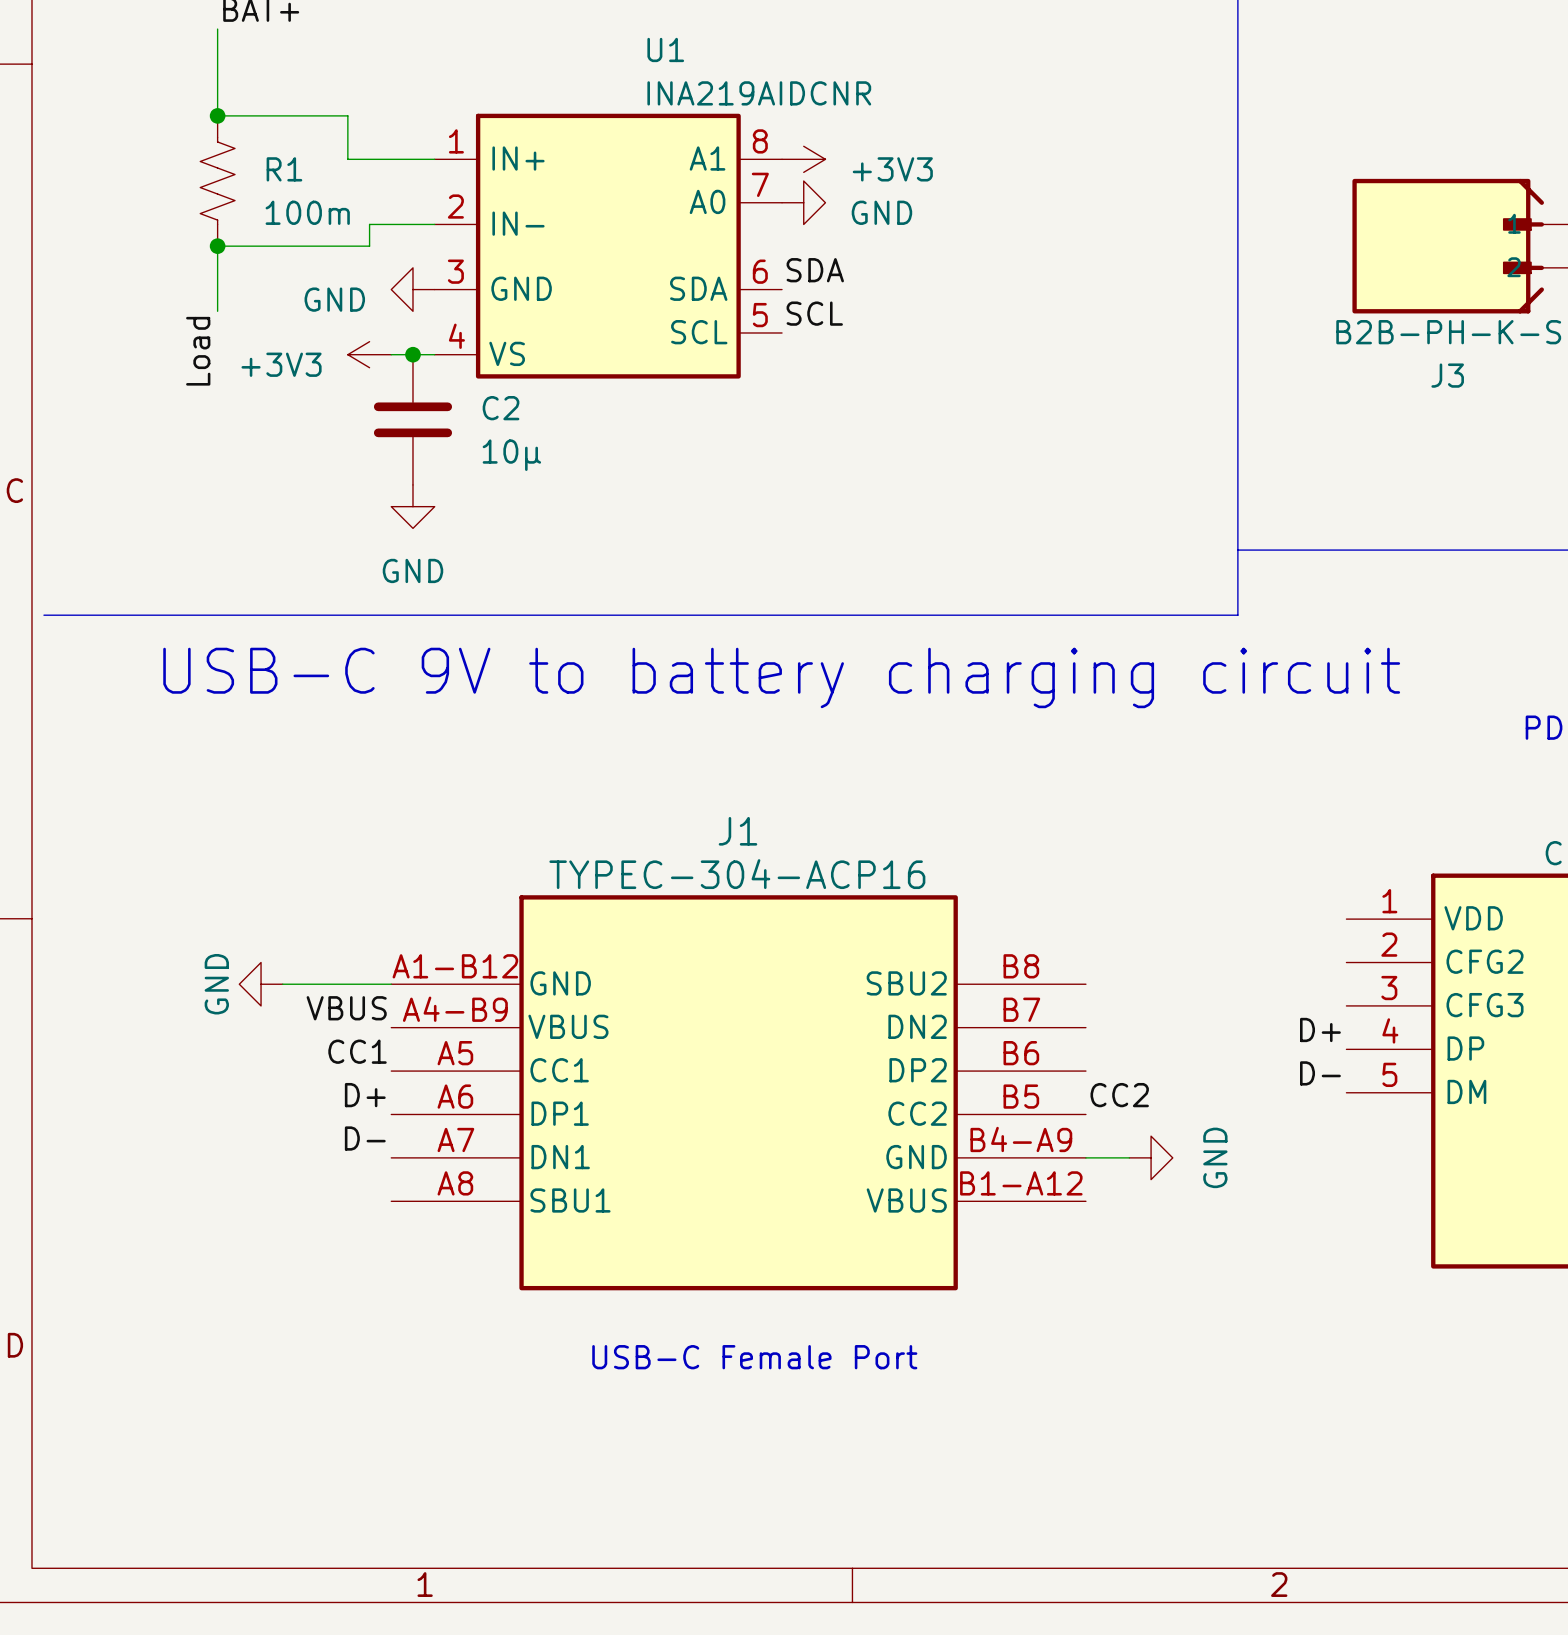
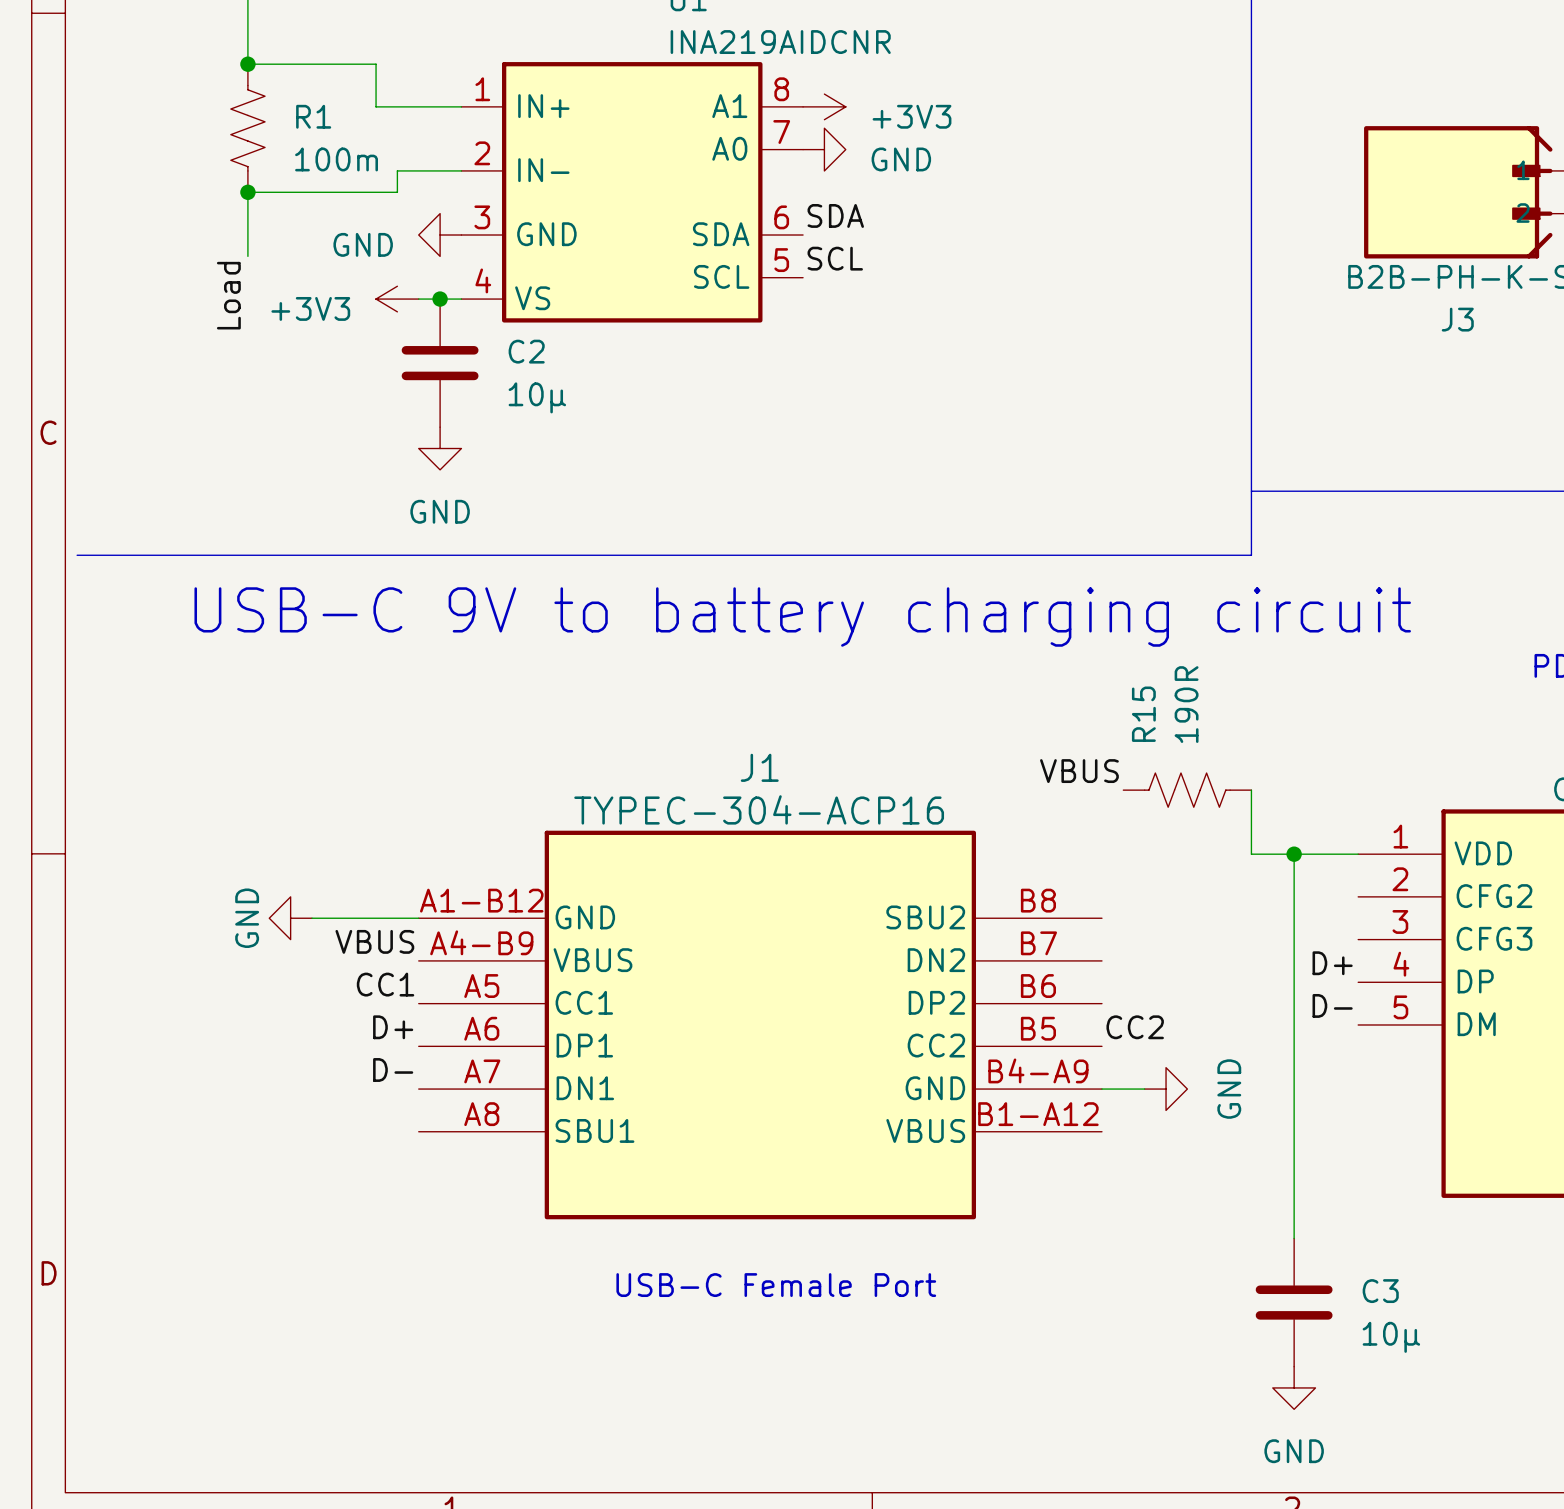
label: none -> VBUS (1079, 771)
R15: none -> 190R (1187, 790)
wire: none -> (1251, 790) (1251, 854) (1358, 854)
wire: none -> (1294, 854) (1294, 1238)
junction: none -> (1294, 854)
C3: none -> 10µ (1294, 1302)
power symbol: none -> GND (1294, 1387)

